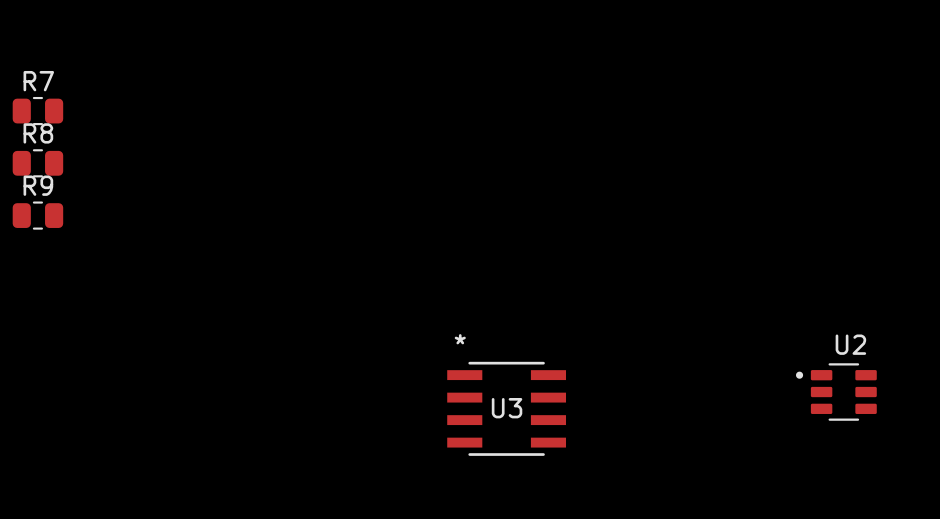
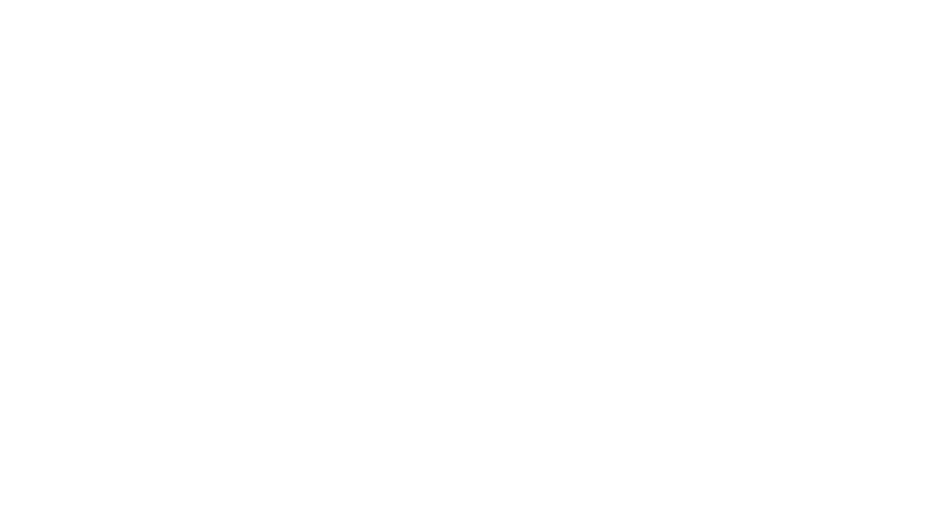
R7: (37, 111) -> none
R8: (37, 163) -> none
R9: (37, 215) -> none
U2: (836, 392) -> none
U3: (506, 408) -> none

